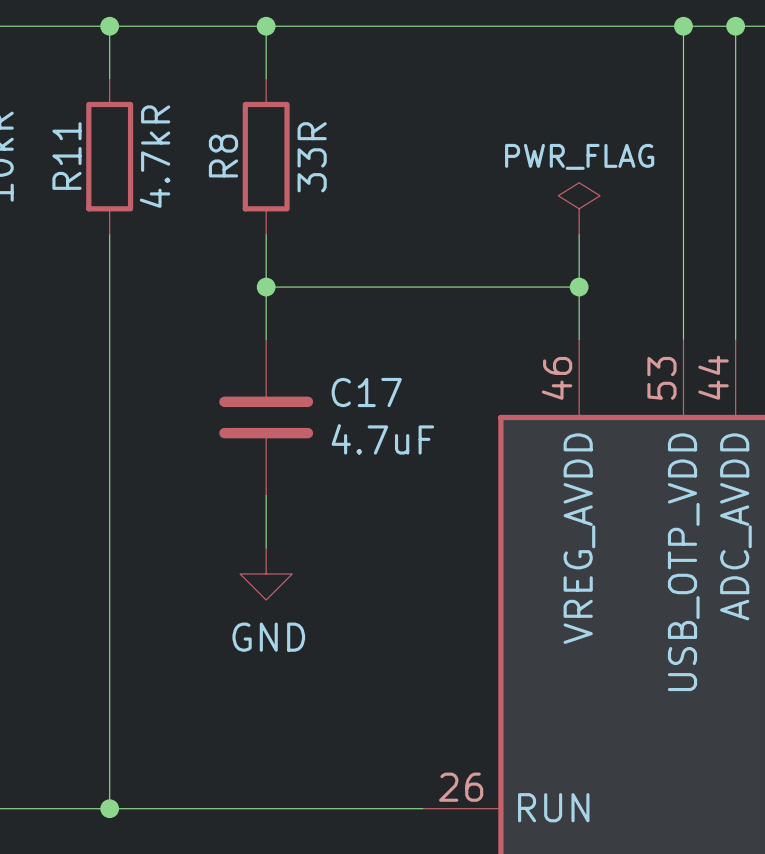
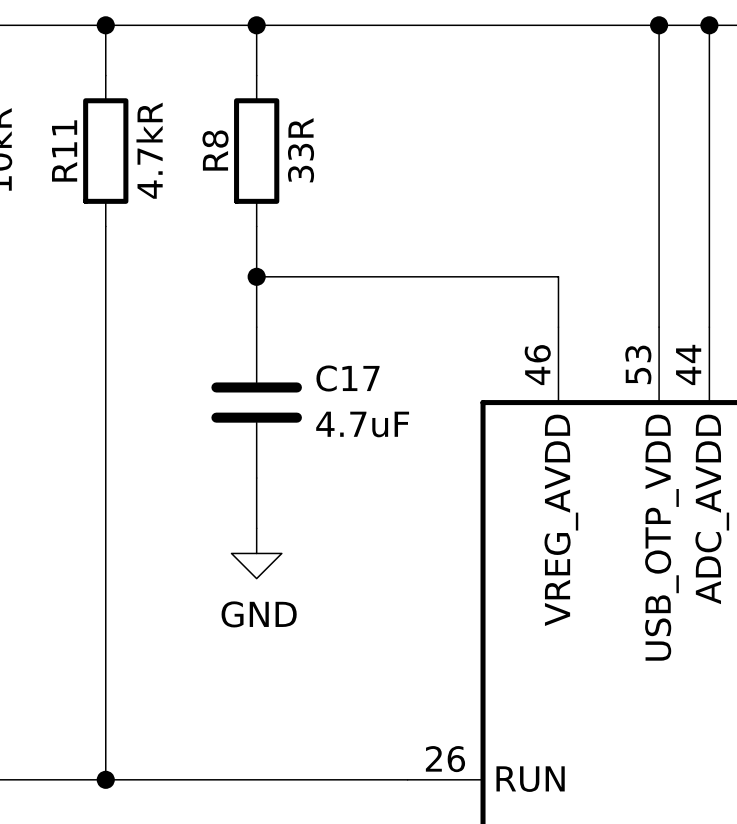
power symbol: PWR_FLAG (579, 208) -> none
wire: (579, 234) (579, 287) -> none
junction: (579, 287) -> none

